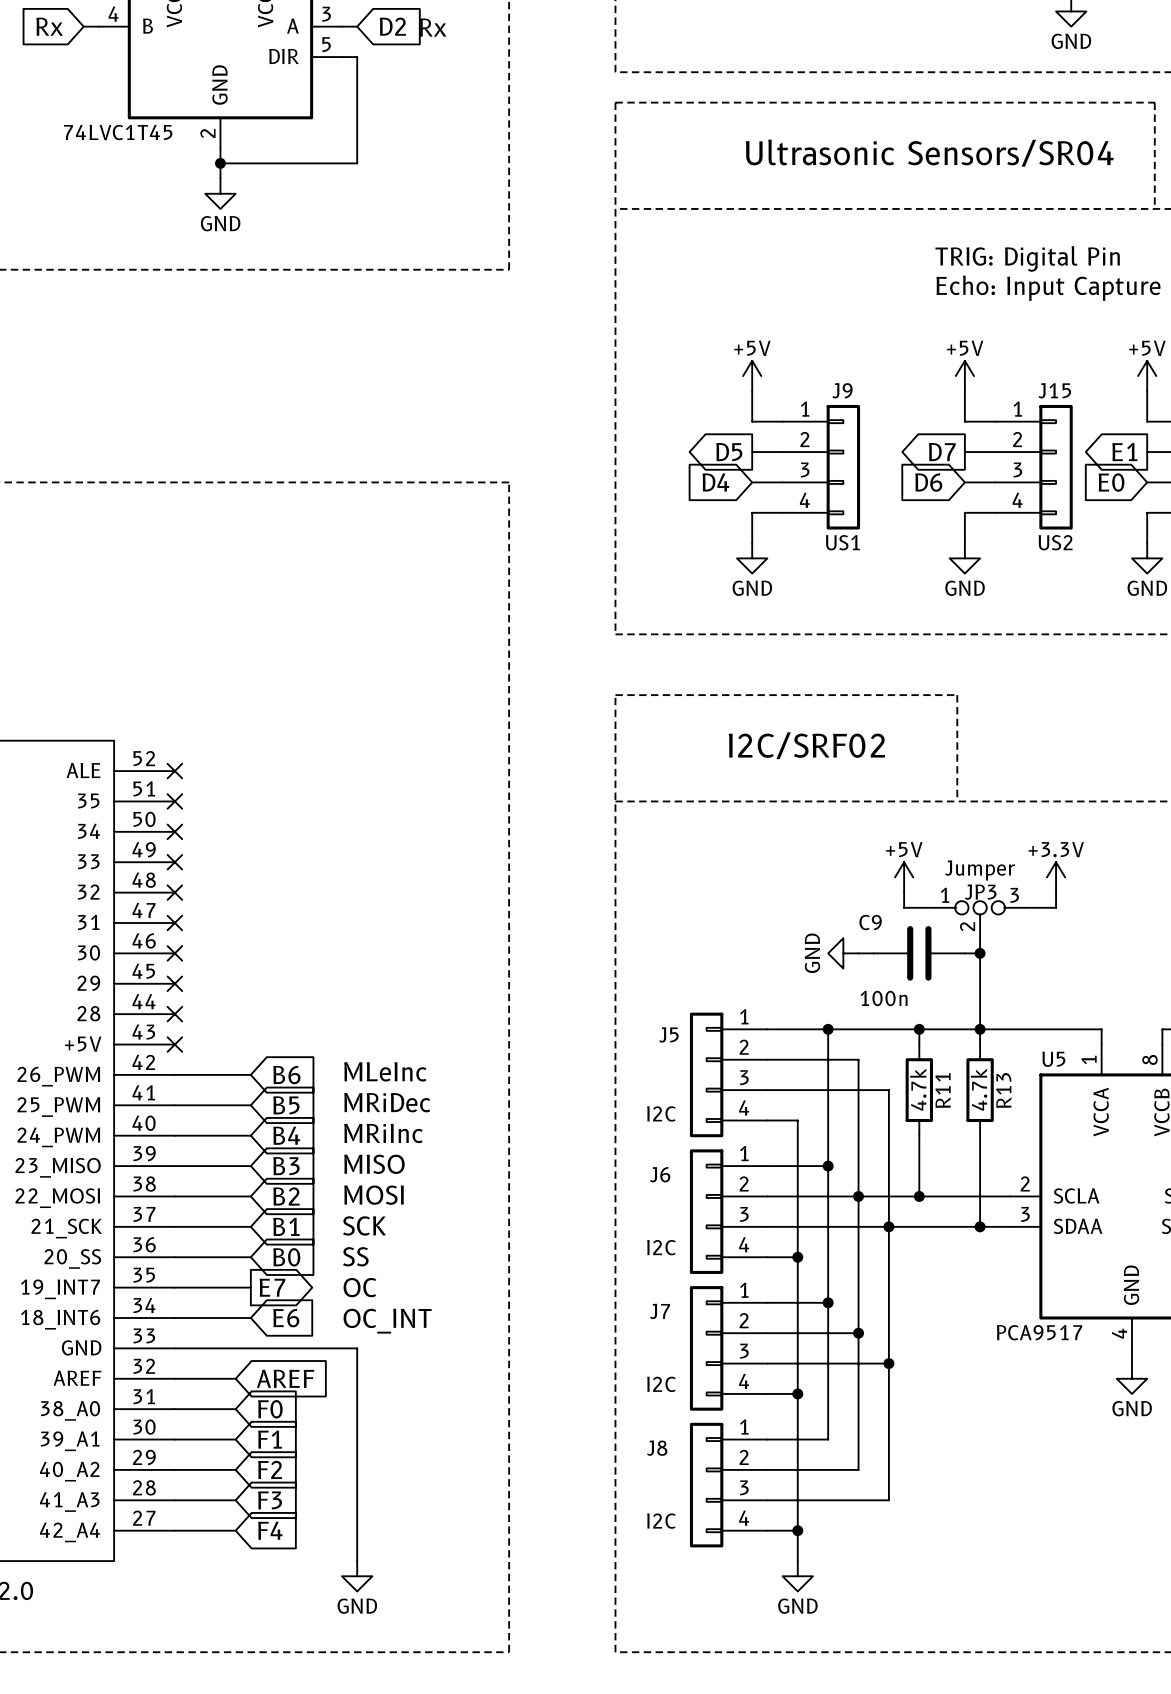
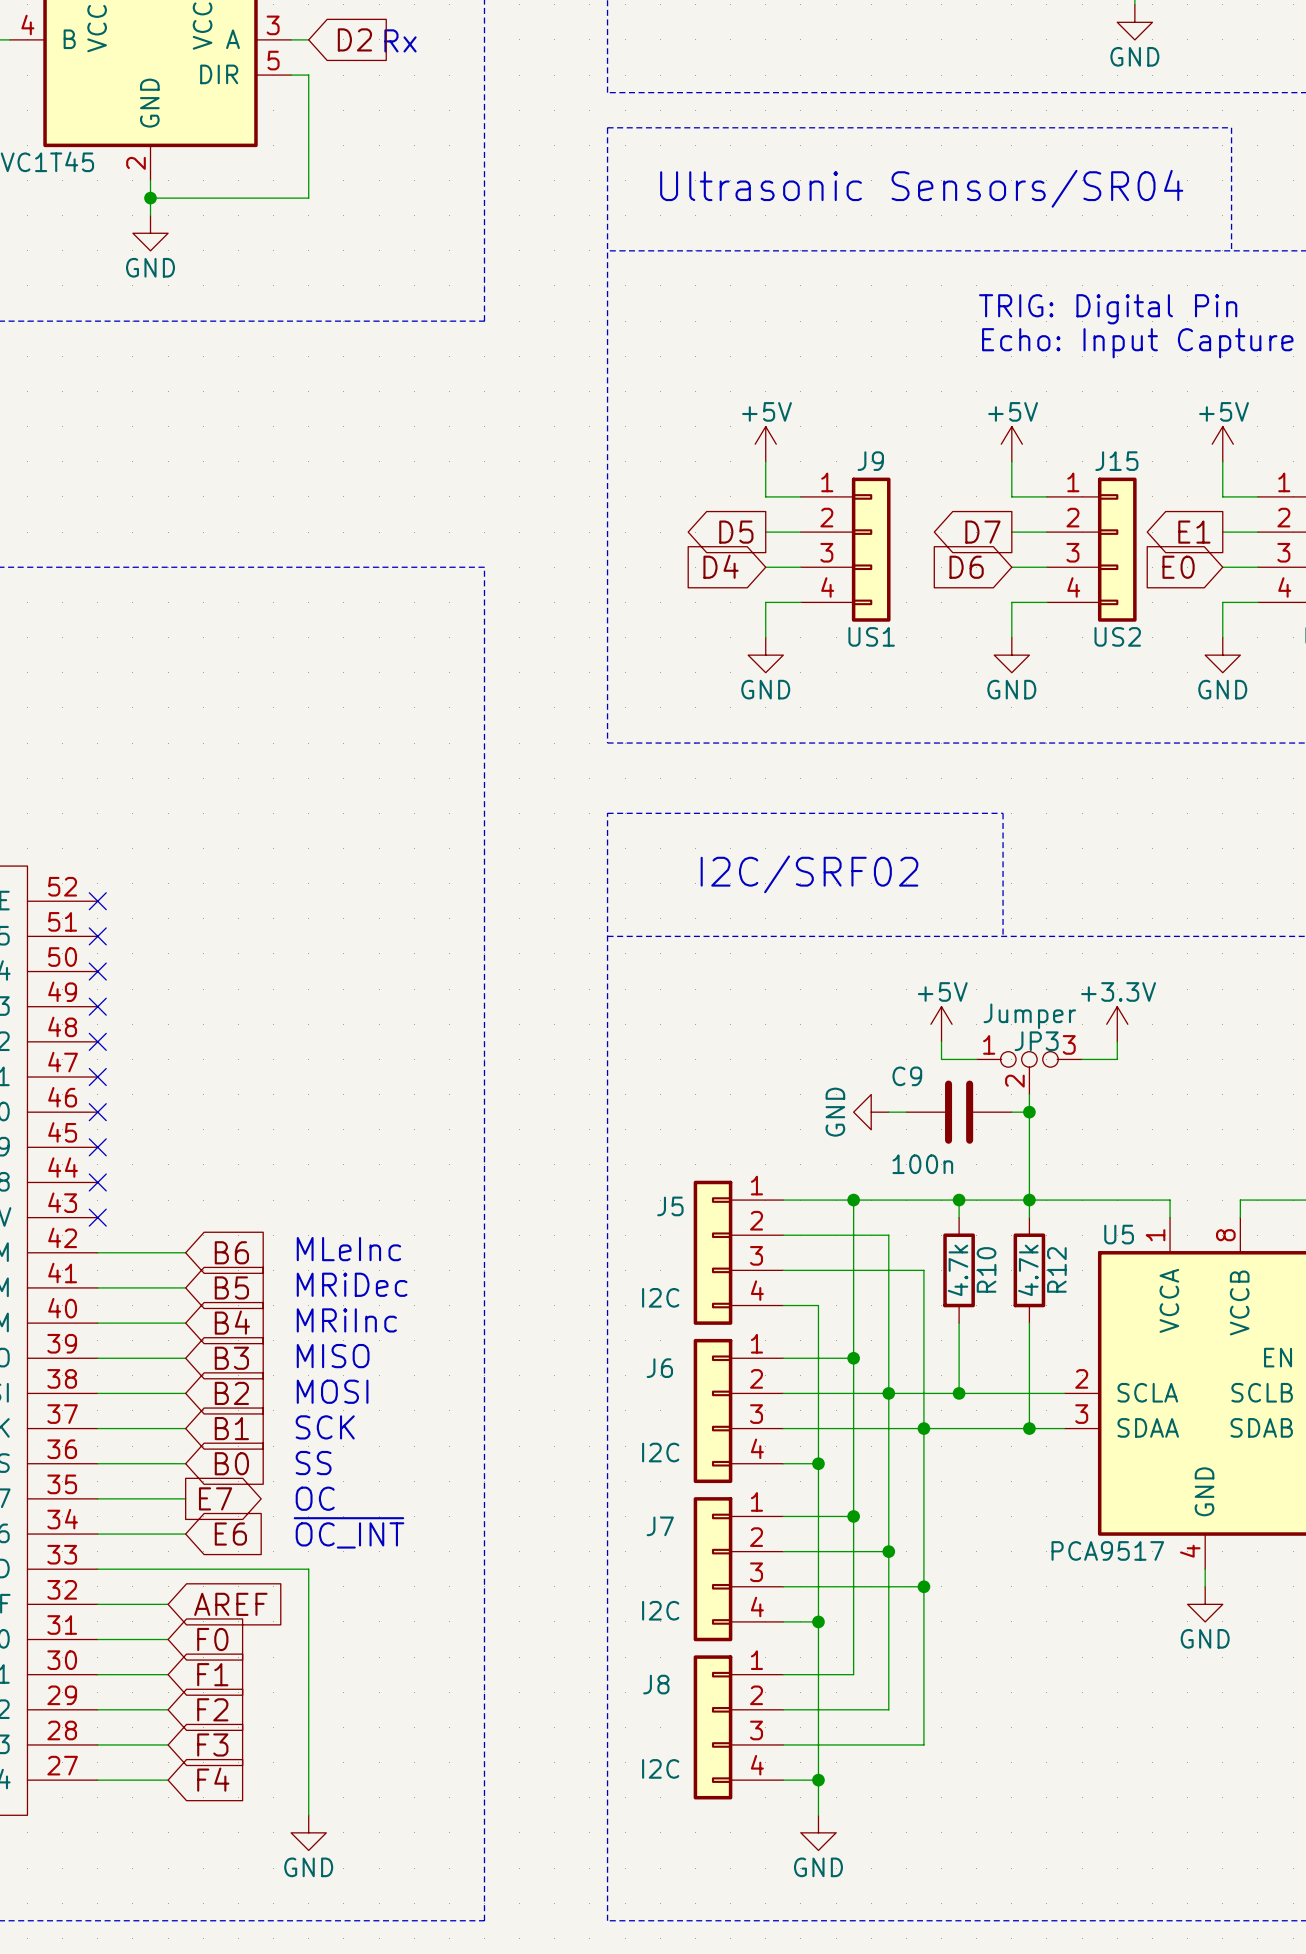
R11 name: R11 (943, 1090) -> R10 (986, 1269)
R13 name: R13 (1003, 1090) -> R12 (1056, 1269)
text: OC_INT (387, 1321) -> ~{OC_INT} (348, 1532)

